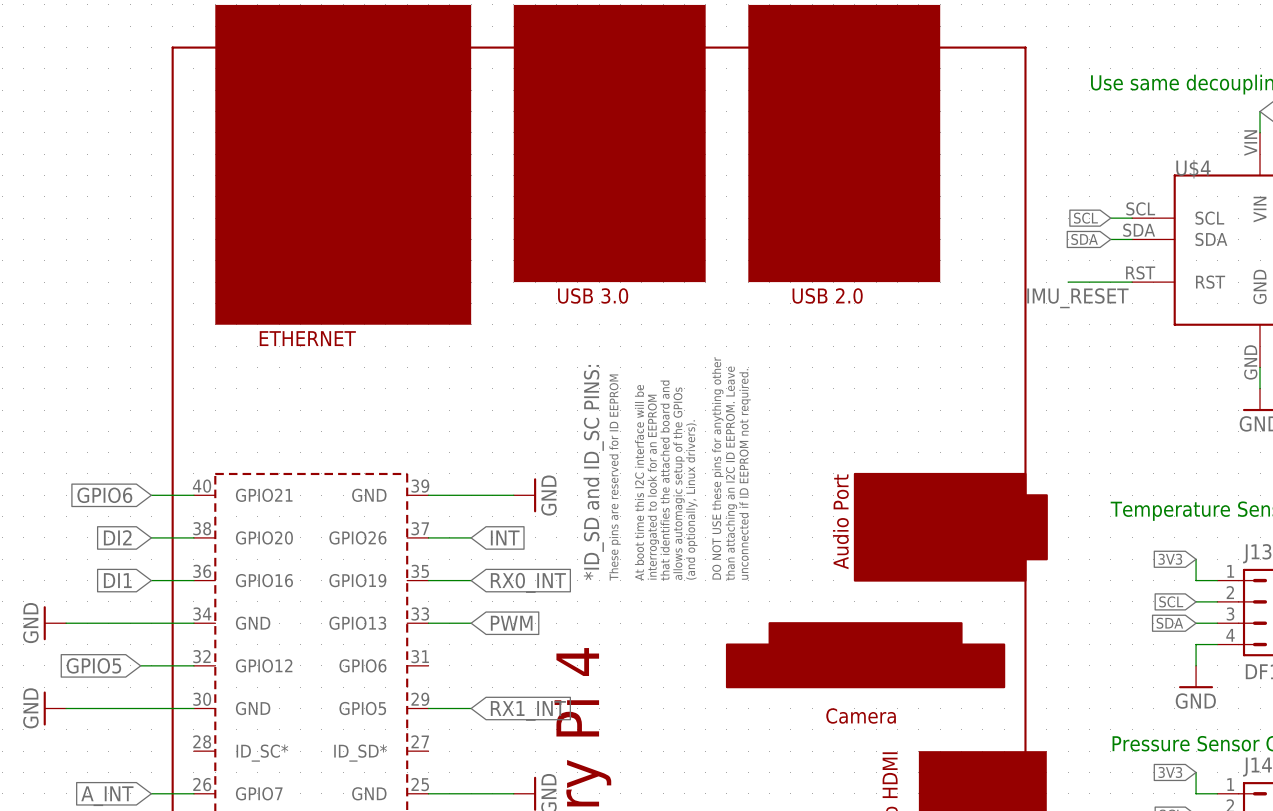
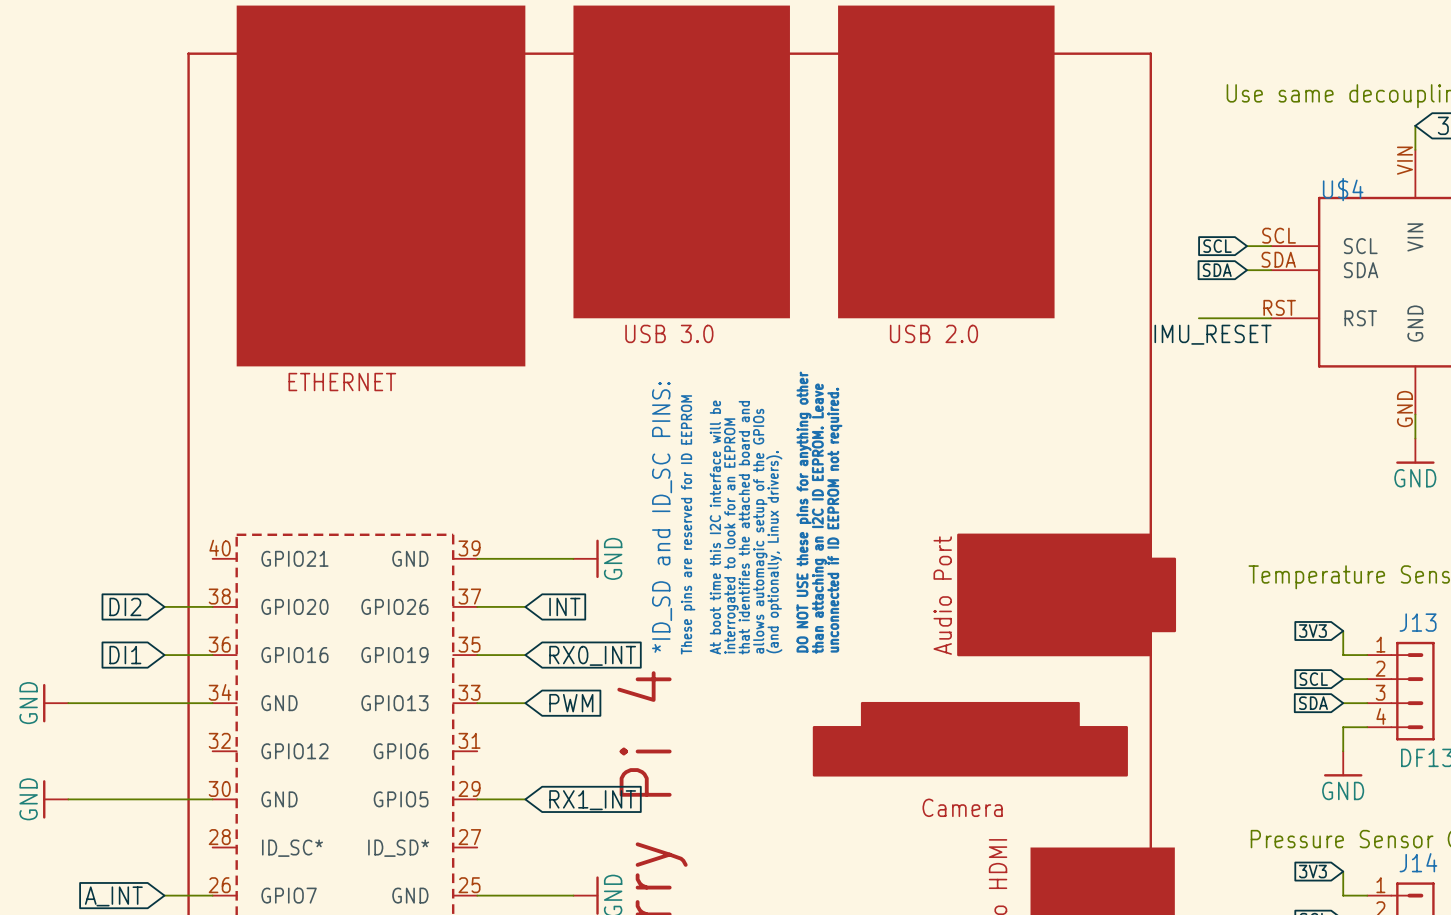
global label: GPIO6 (104, 495) -> none
wire: (151, 495) (193, 495) -> none
global label: GPIO5 (93, 665) -> none
wire: (140, 665) (193, 665) -> none

